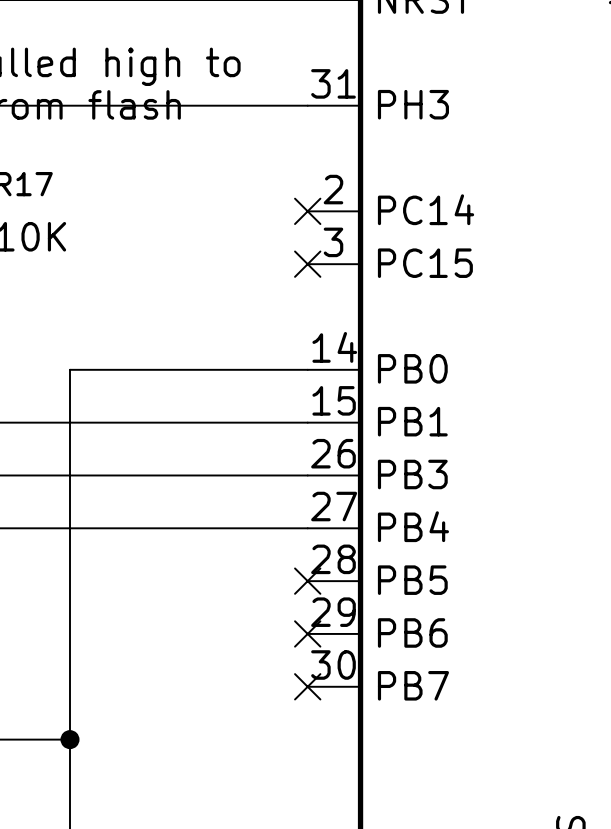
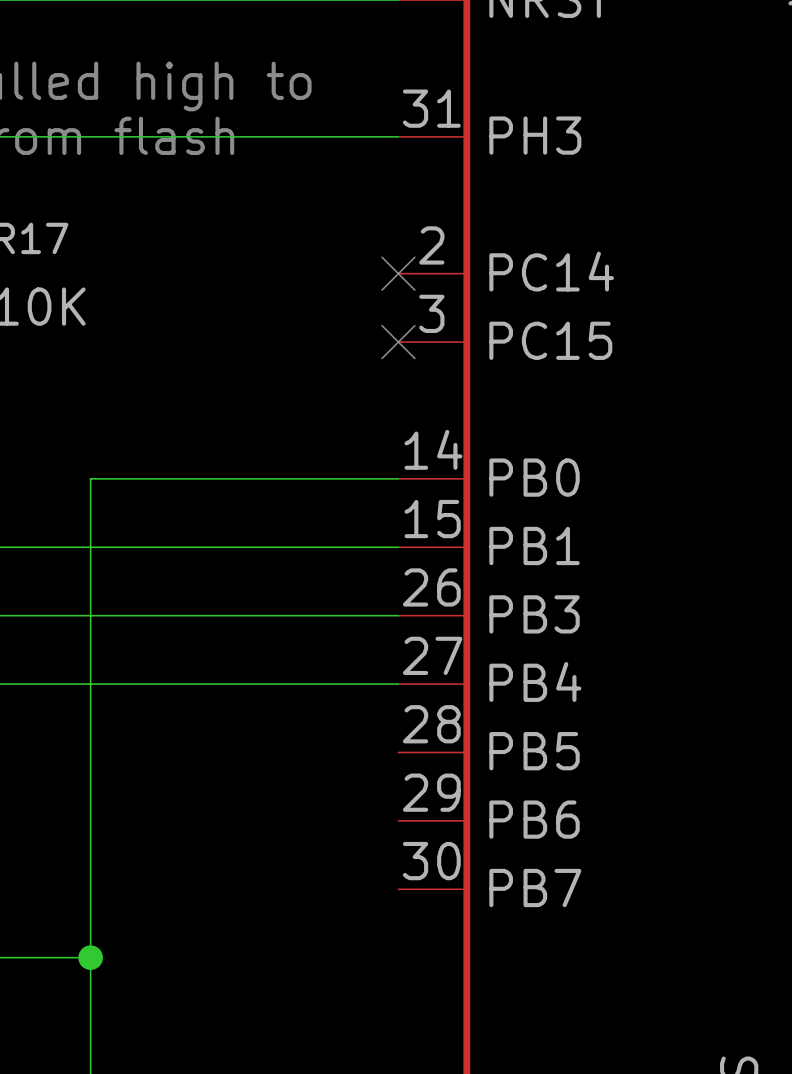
no-connect mark: (307, 581) -> none
no-connect mark: (307, 633) -> none
no-connect mark: (307, 686) -> none

